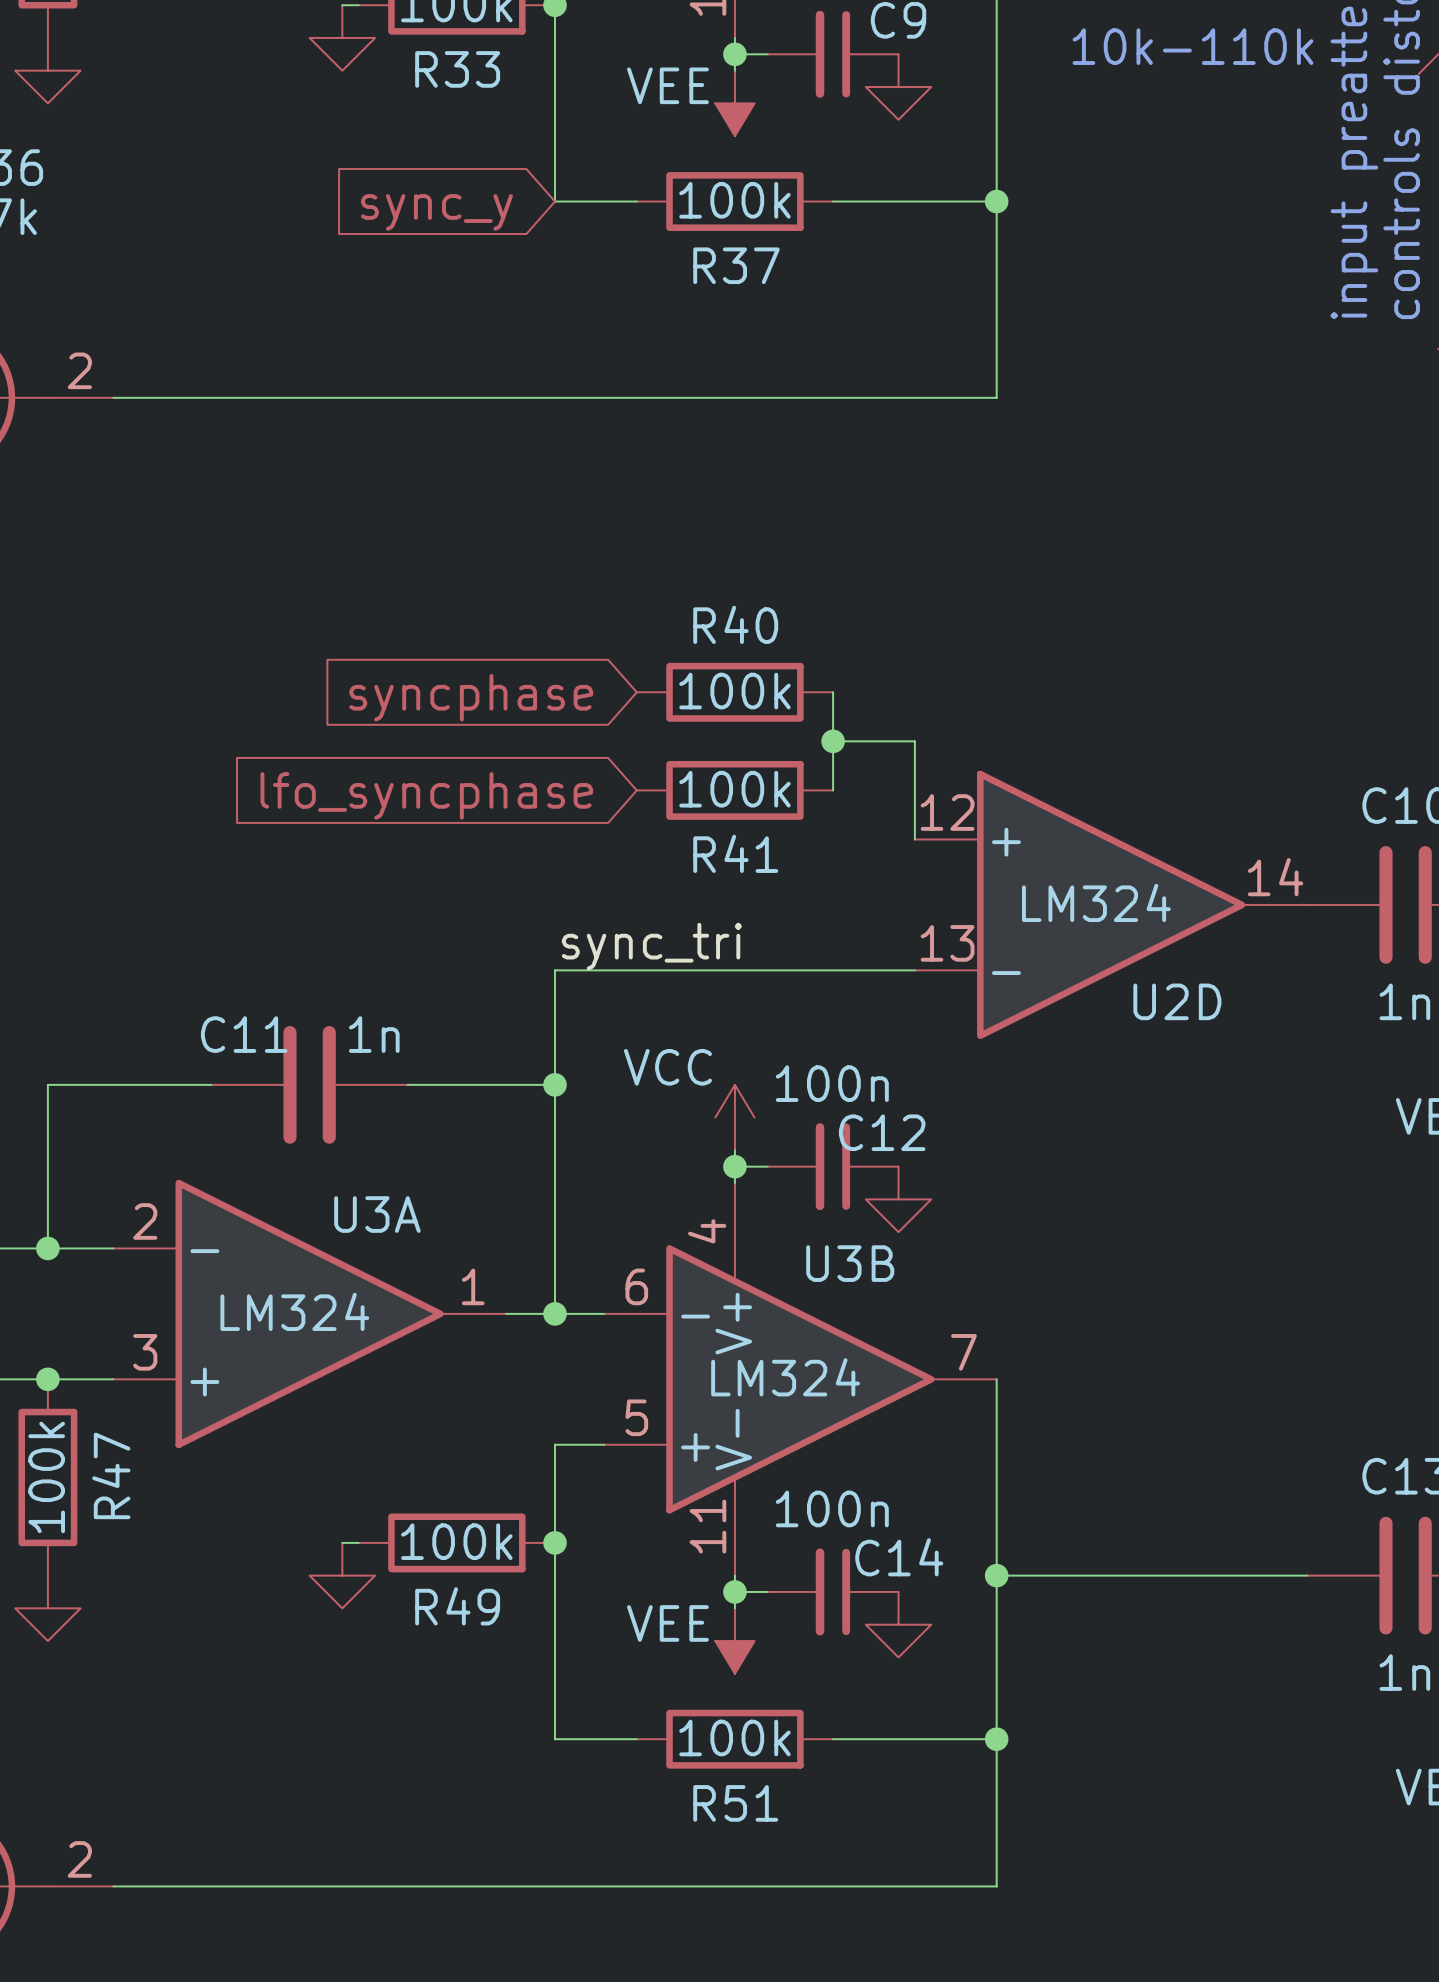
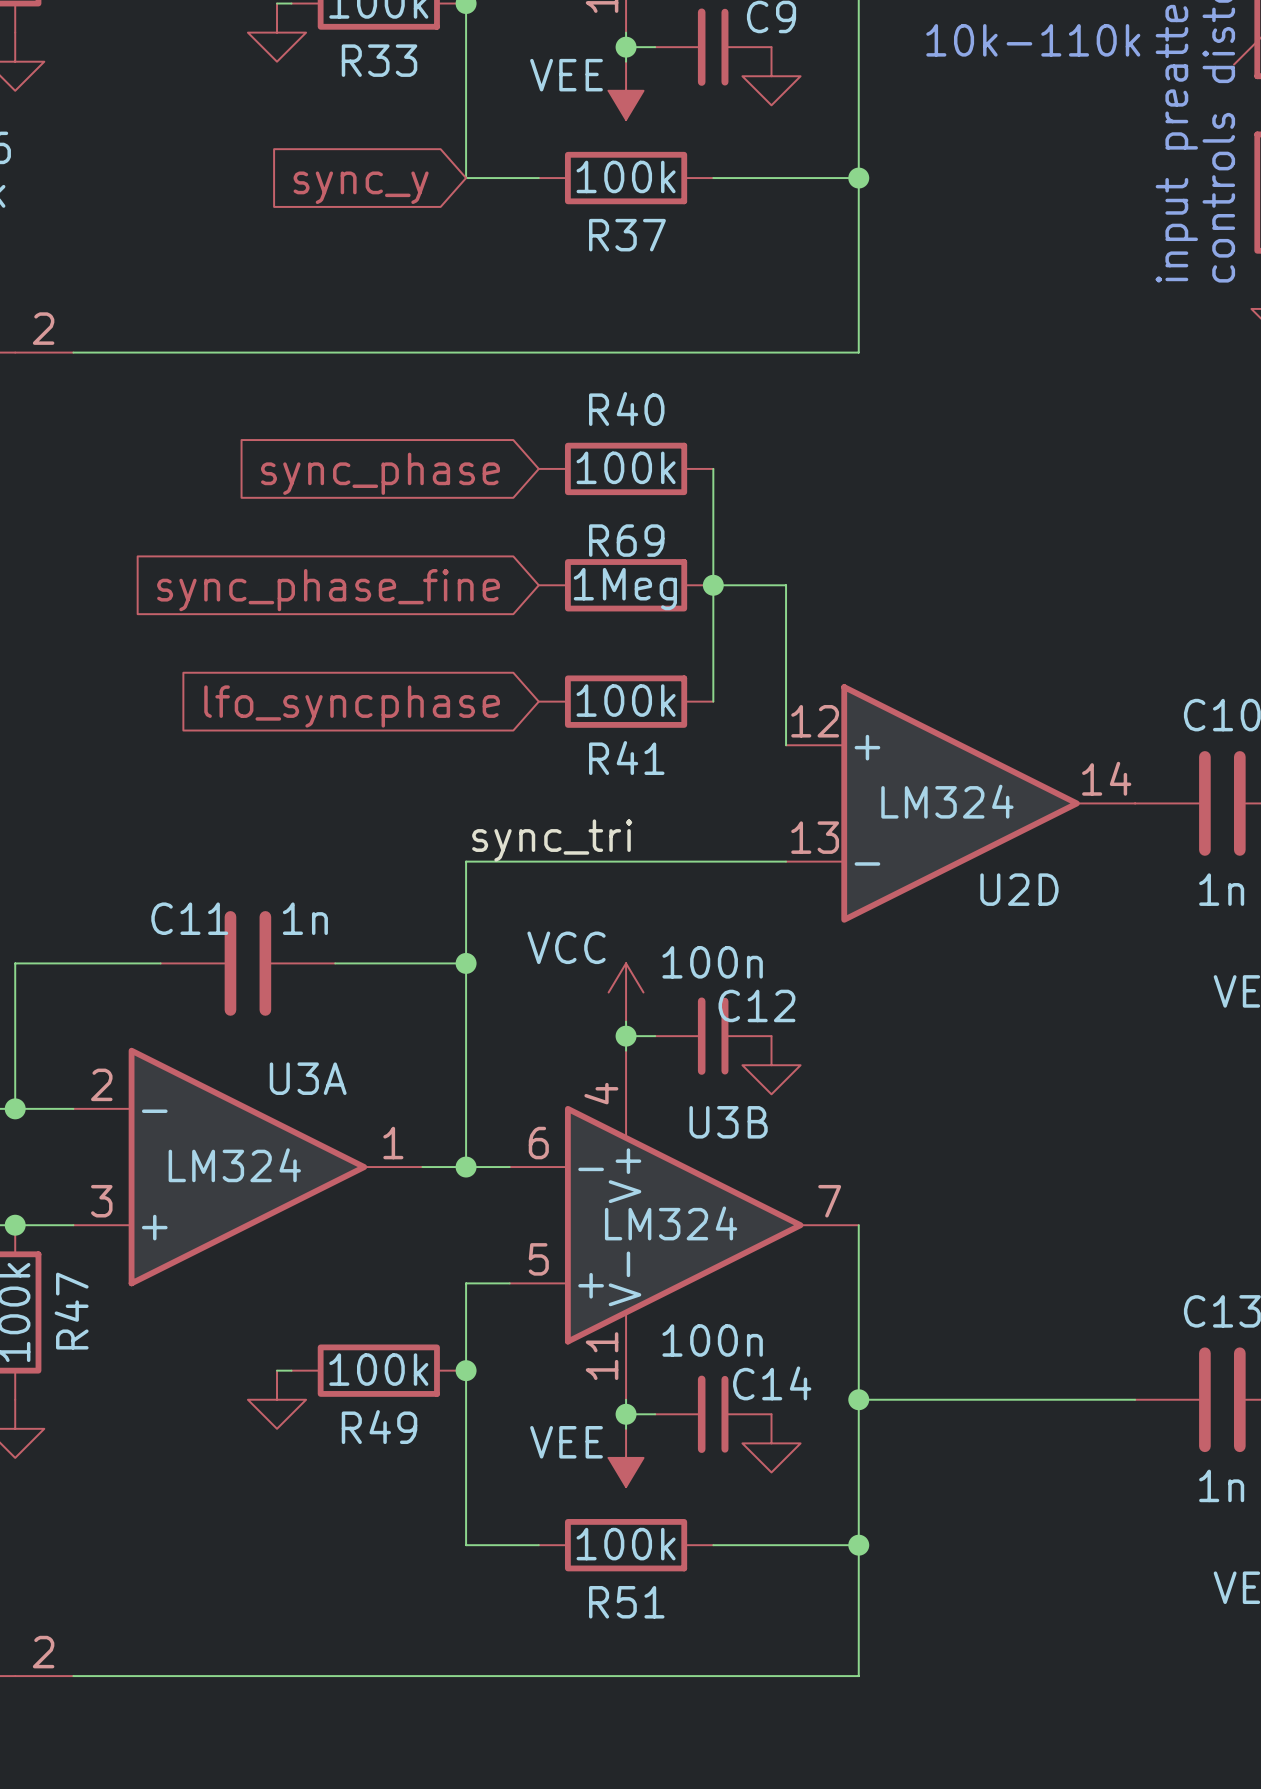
wire: none -> (713, 468) (713, 614)
global label: none -> sync_phase (380, 473)
R69: none -> 1Meg (626, 585)
R40 position: (734, 692) -> (626, 468)
global label: syncphase (471, 697) -> sync_phase_fine (328, 590)
wire: (833, 741) (914, 741) -> (713, 585) (786, 585) (786, 658)
junction position: (833, 741) -> (713, 585)

